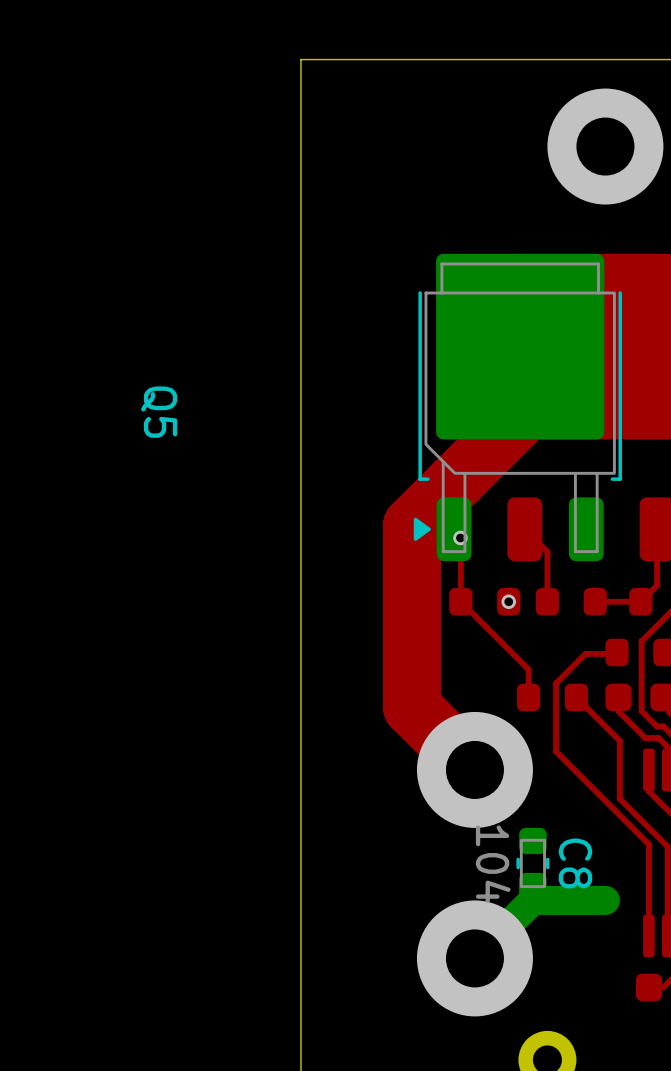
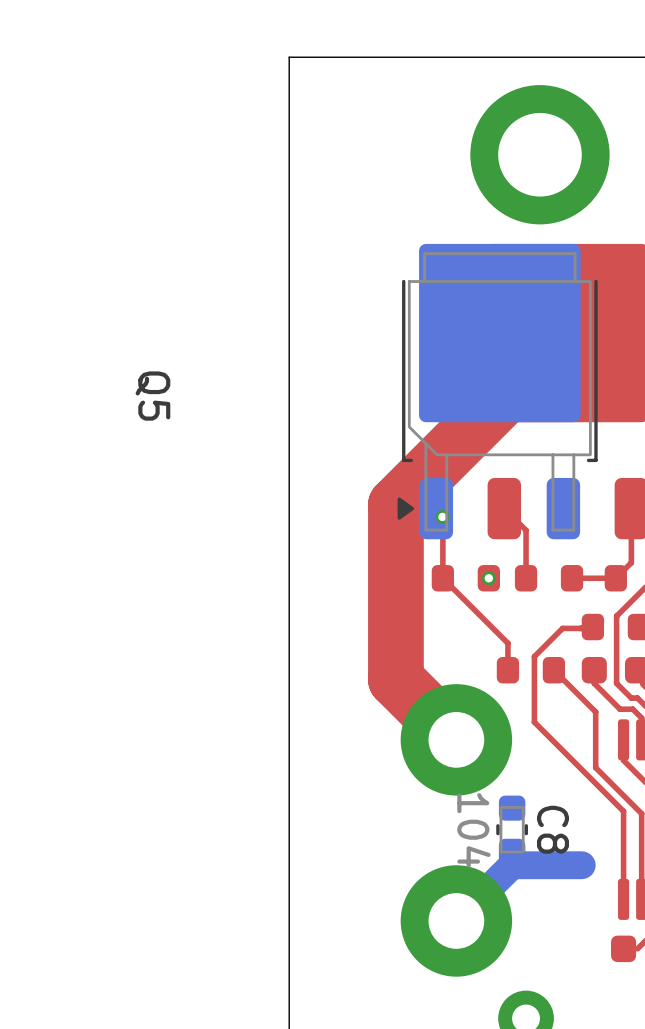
via: (605, 146) -> none
via: none -> (539, 154)

